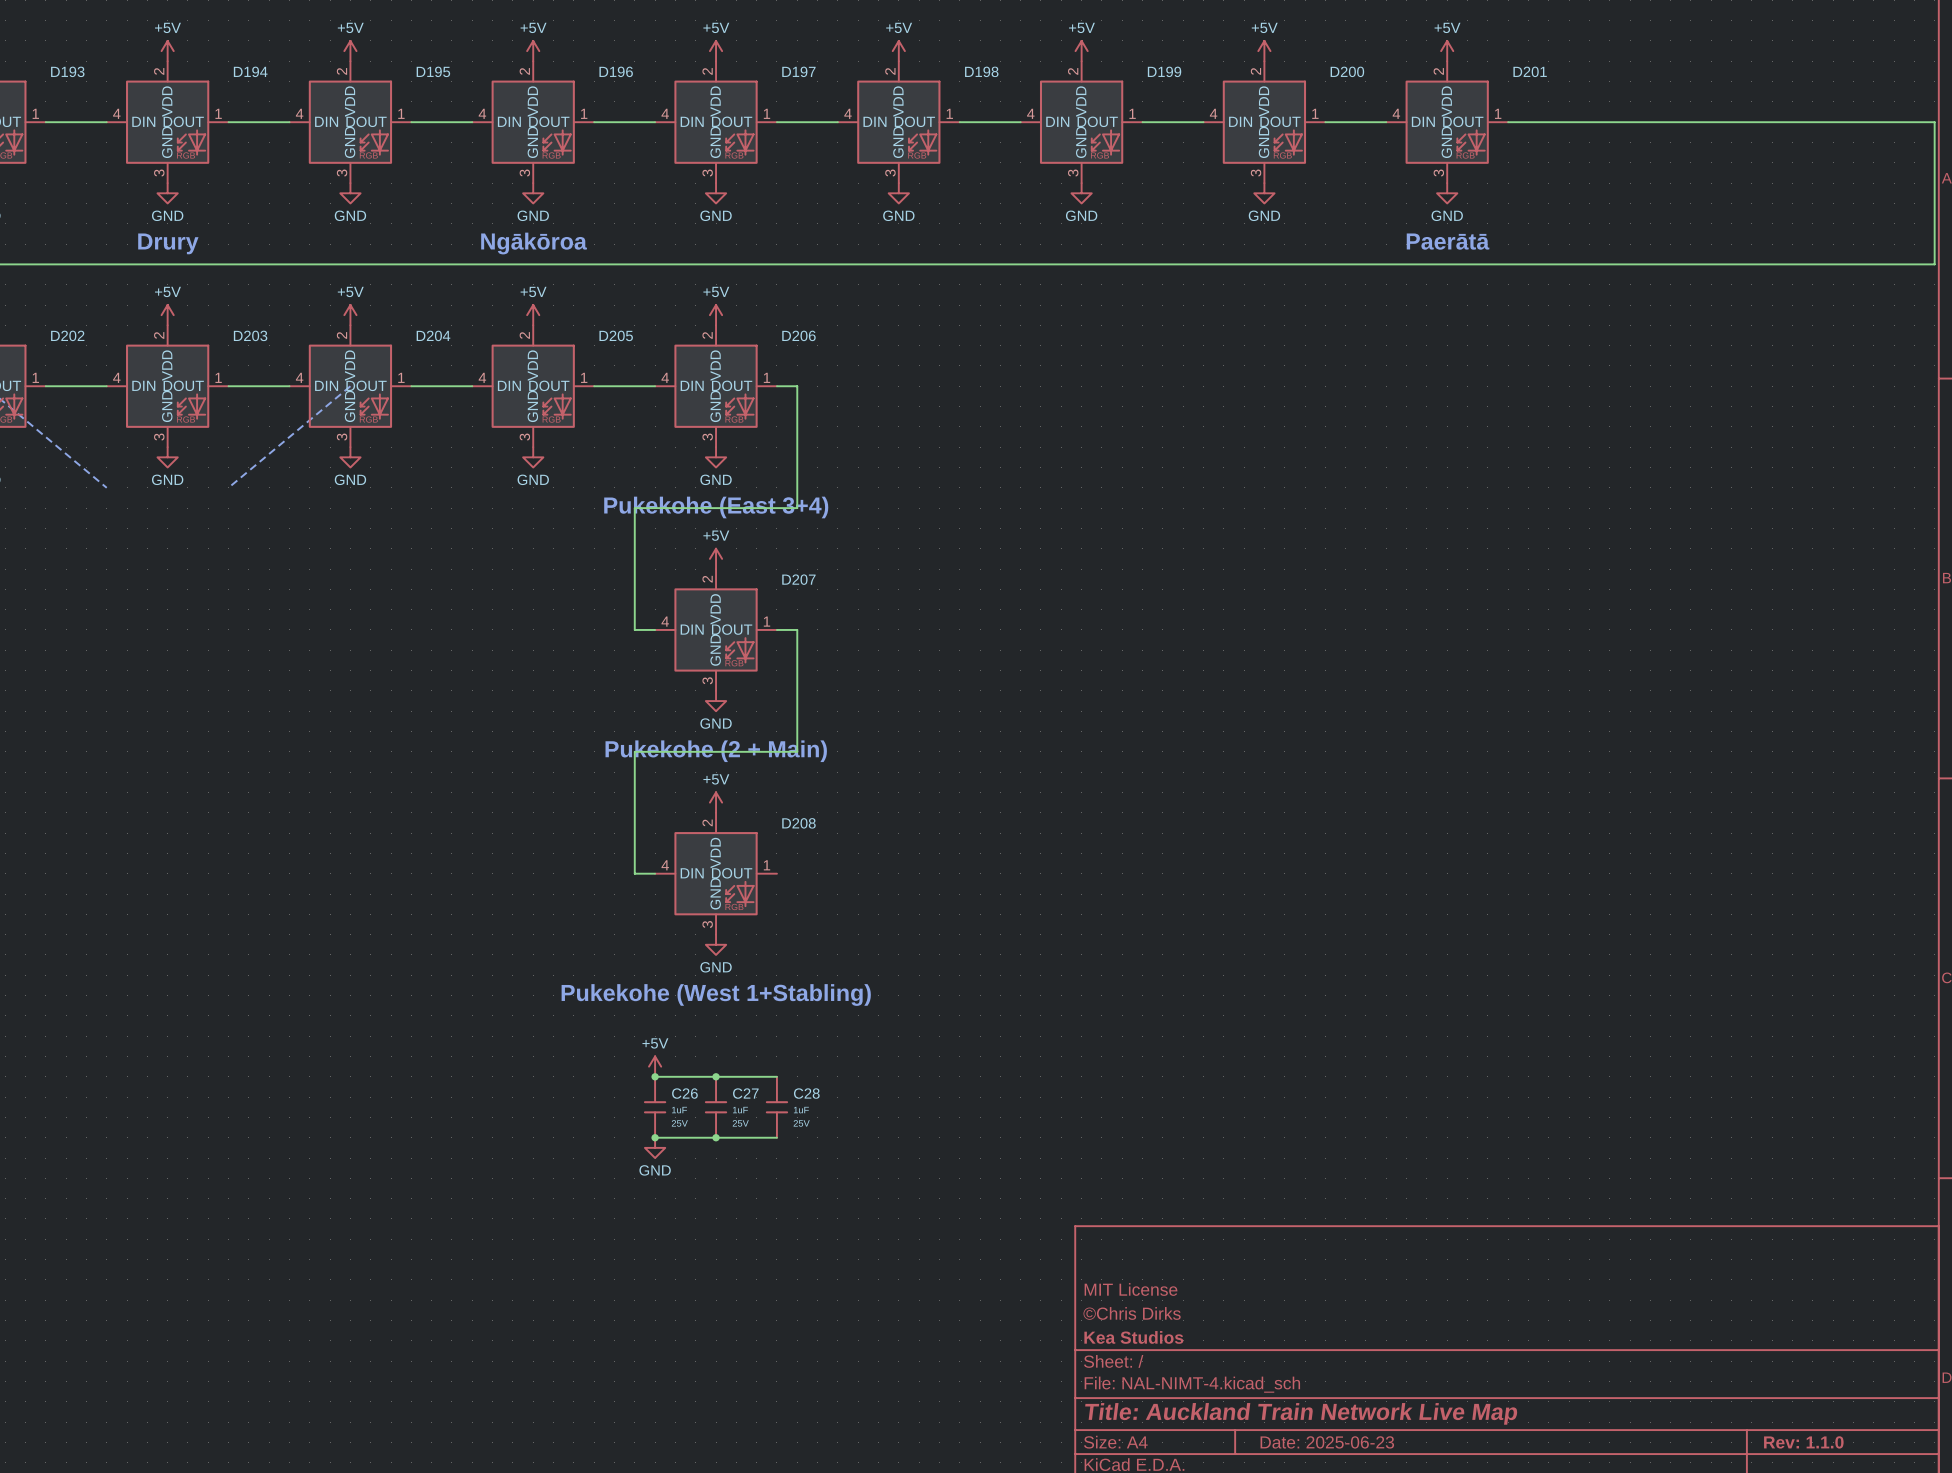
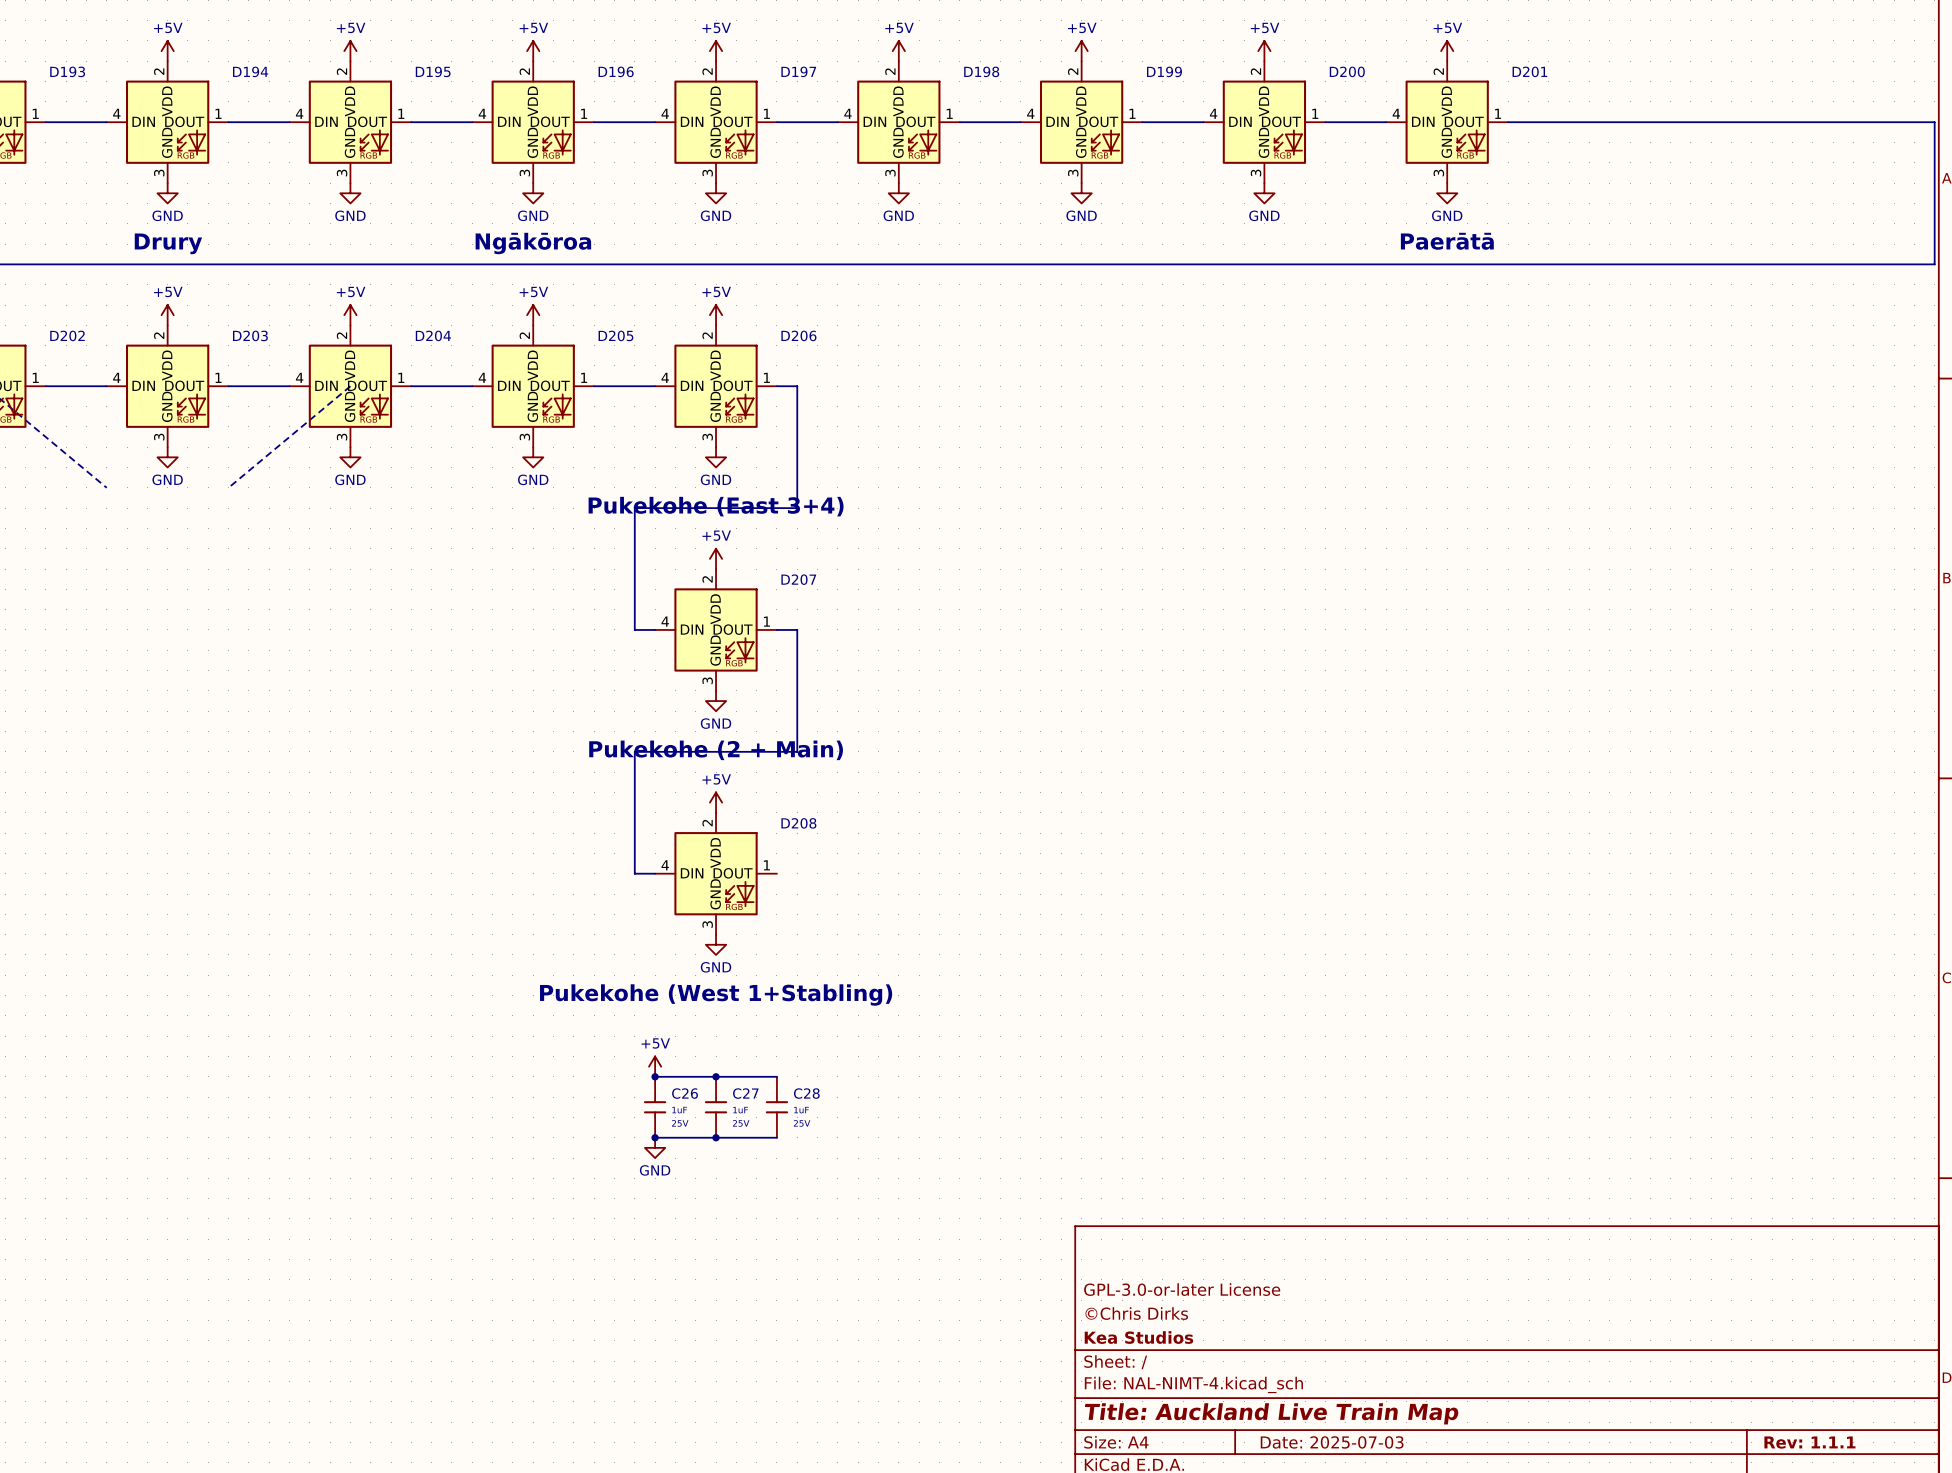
title block: MIT License (1131, 1289) -> GPL-3.0-or-later License (1182, 1289)
title block: Title: Auckland Train Network Live Map (1301, 1413) -> Title: Auckland Live Train Map (1271, 1413)
title block: Date: 2025-06-23 (1327, 1442) -> Date: 2025-07-03 (1332, 1442)
title block: Rev: 1.1.0 (1803, 1442) -> Rev: 1.1.1 (1809, 1442)

